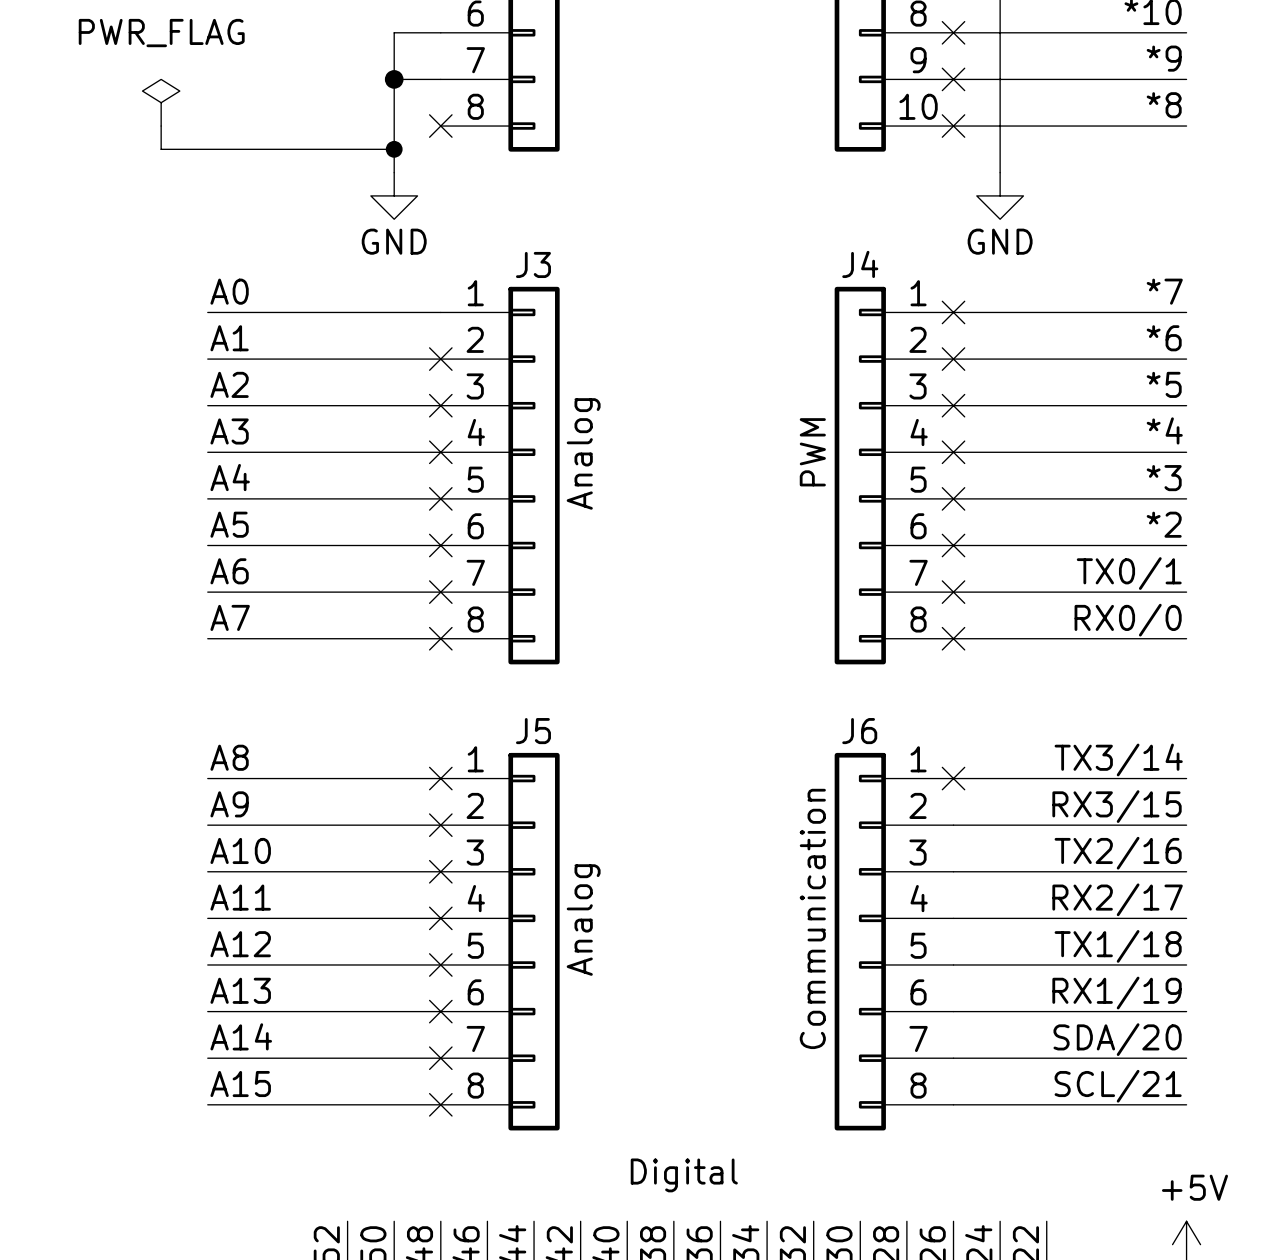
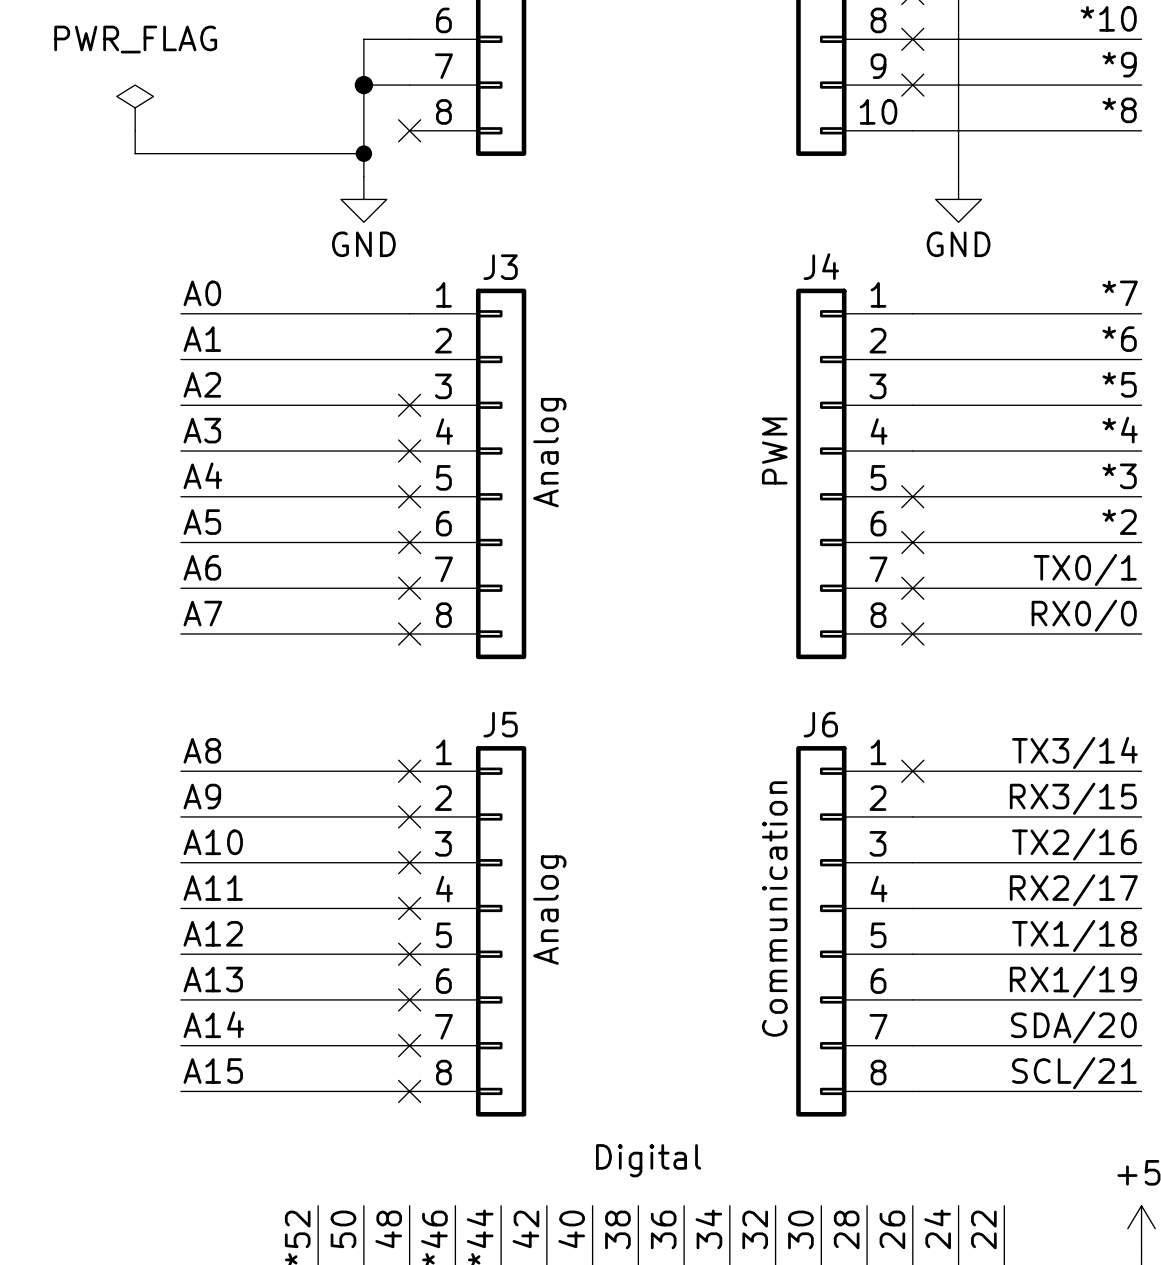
no-connect mark: (953, 126) -> none
no-connect mark: (953, 312) -> none
no-connect mark: (440, 359) -> none
no-connect mark: (953, 359) -> none
no-connect mark: (953, 405) -> none
no-connect mark: (953, 452) -> none

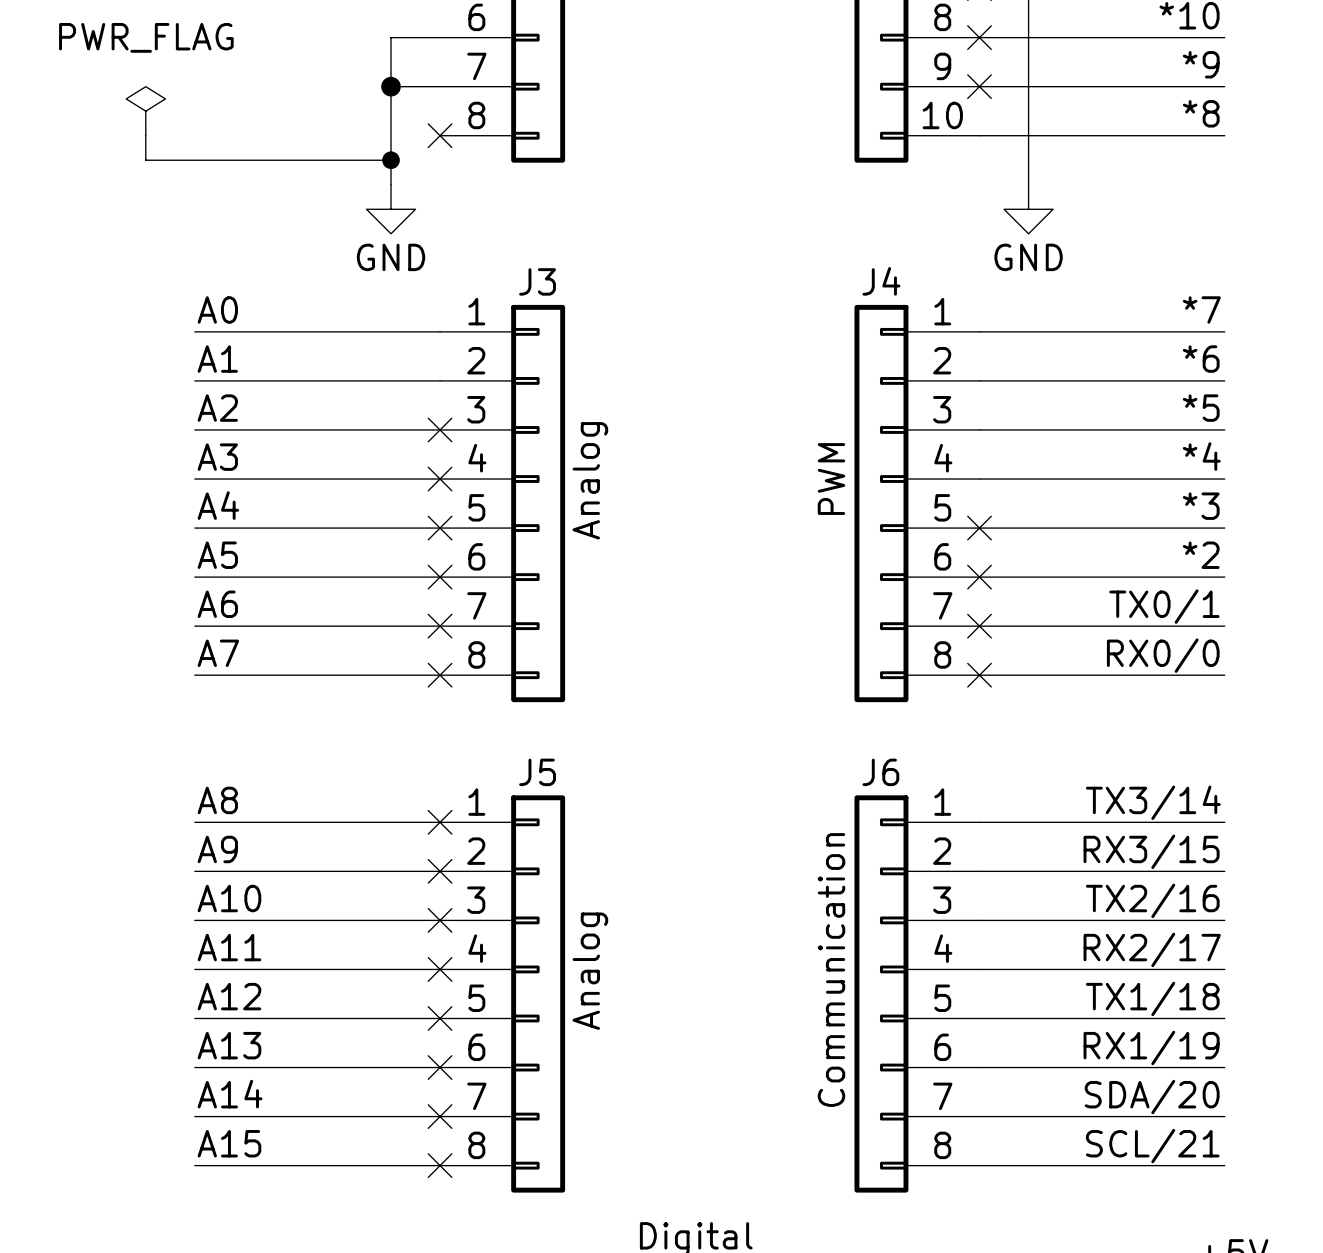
no-connect mark: (912, 771) -> none

